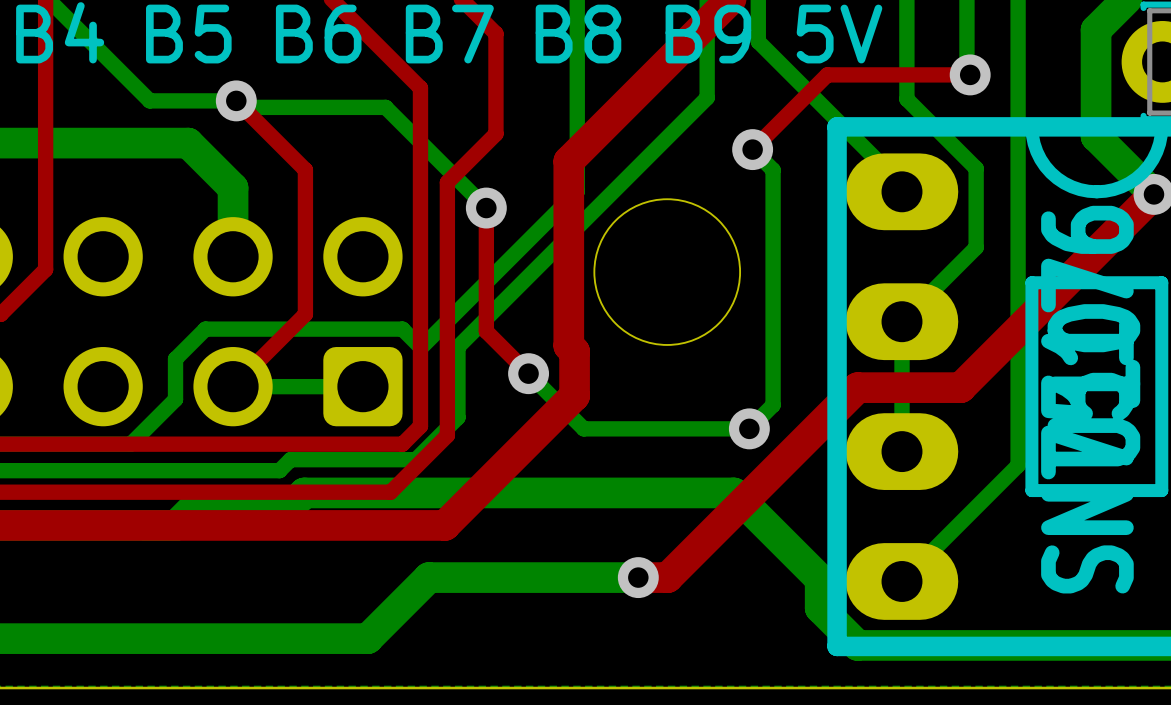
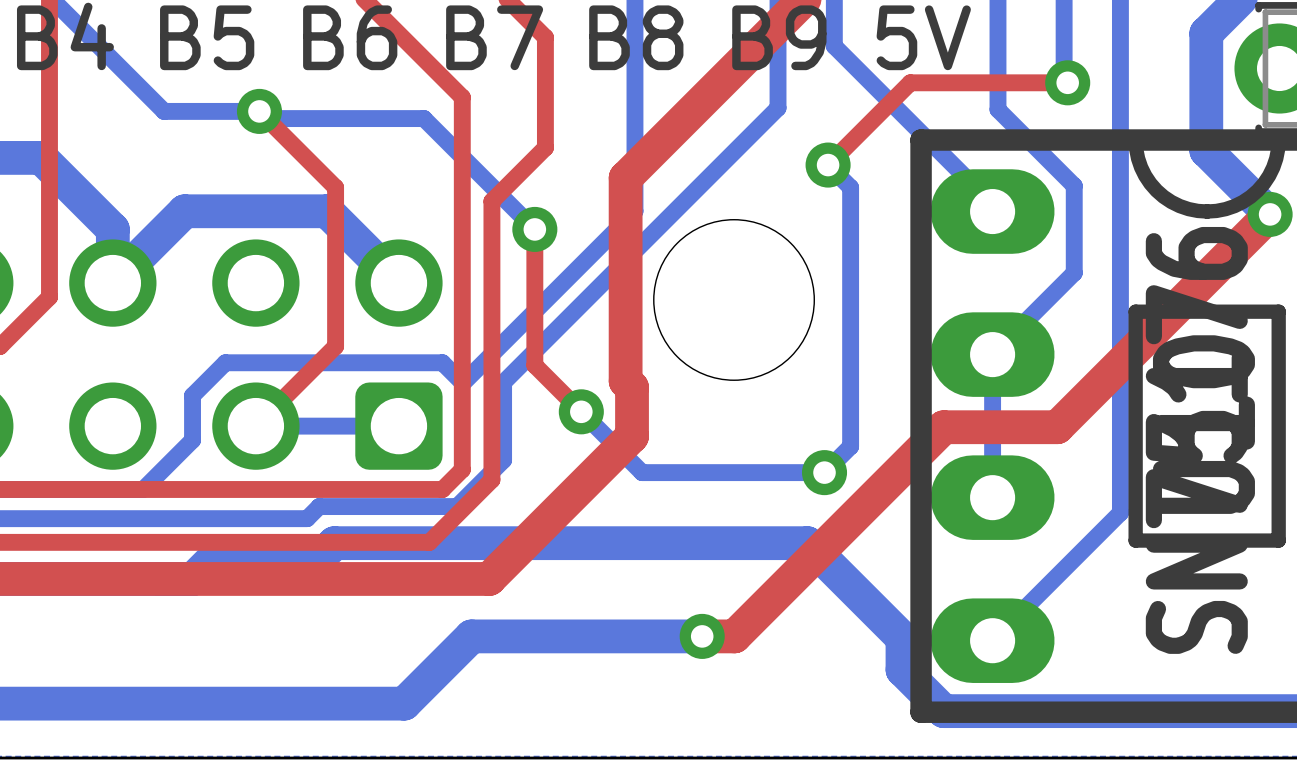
bottom track: (38, 143) (188, 143) (233, 187) (233, 256) -> (41, 157) (112, 229) (112, 283) (184, 211) (327, 211) (398, 283)

